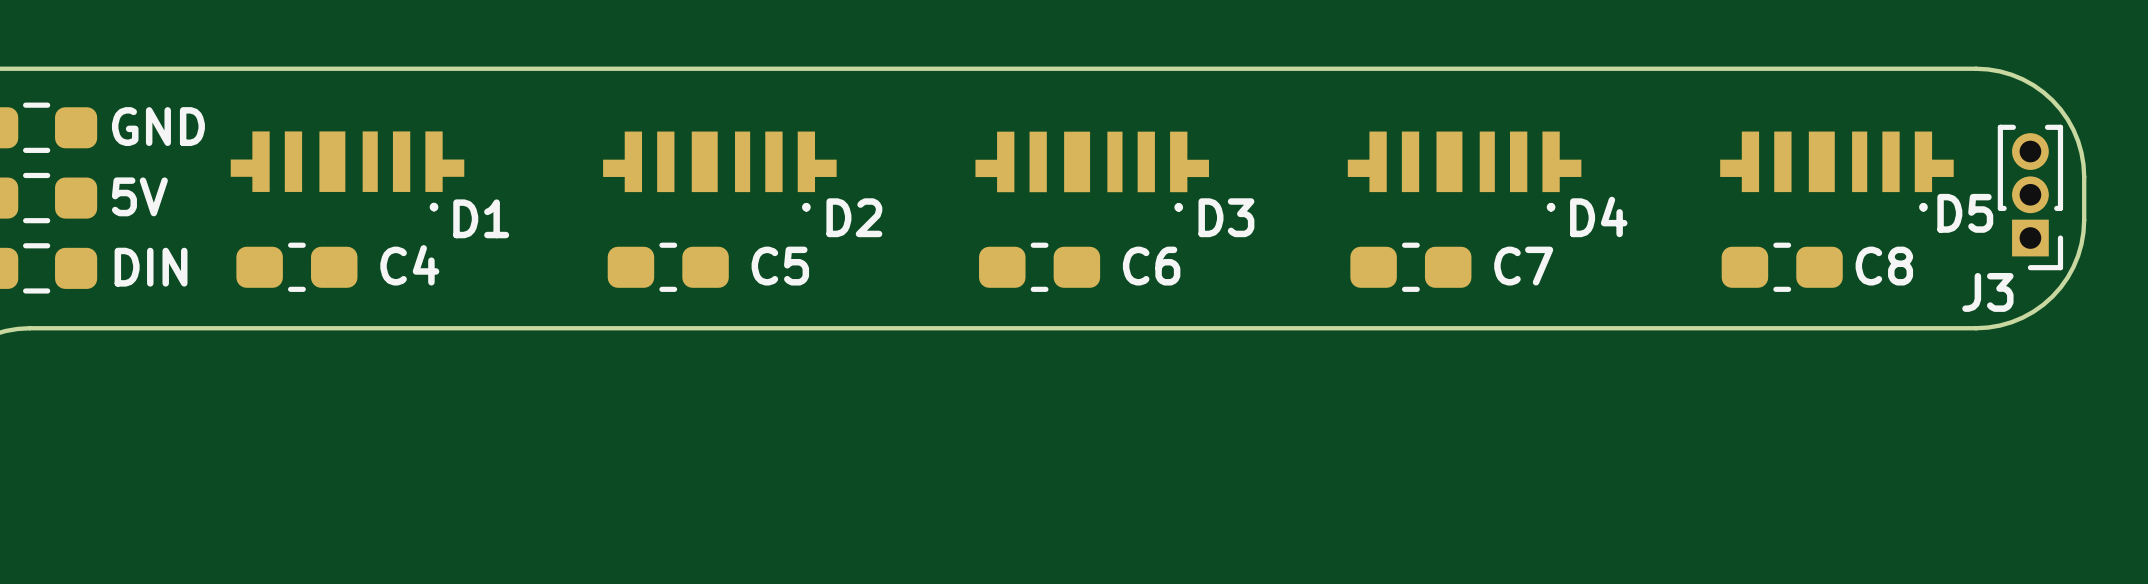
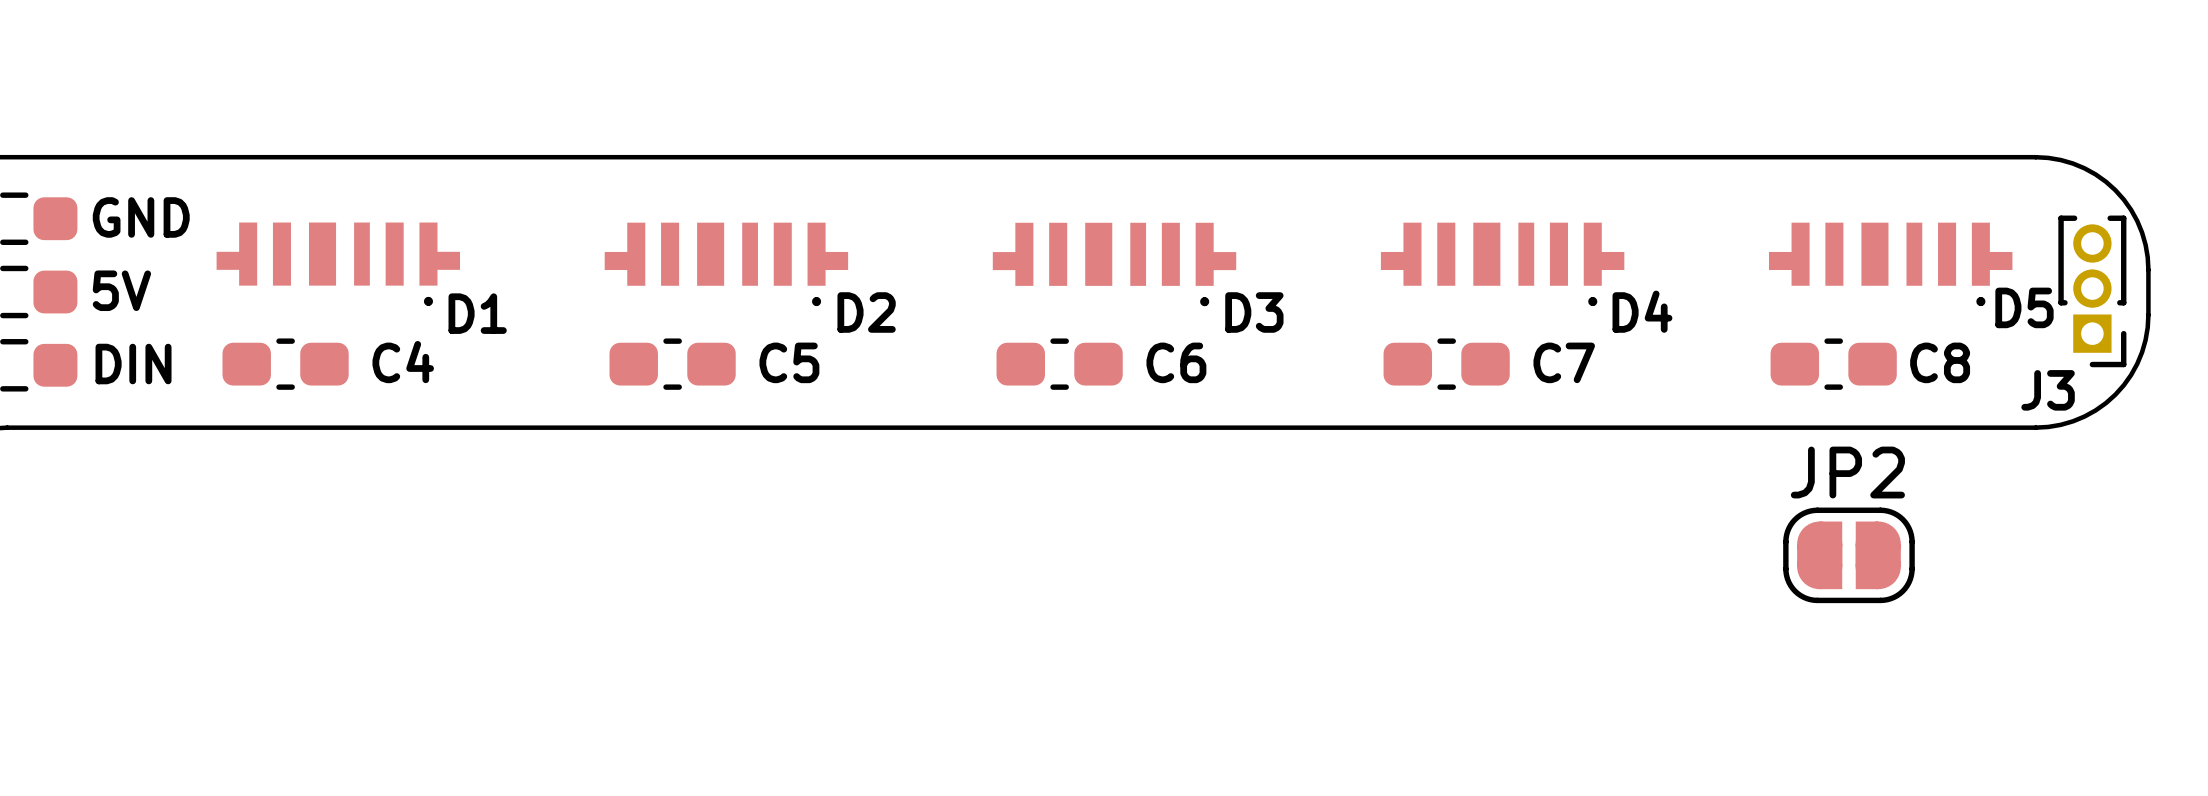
JP2: none -> (1848, 555)

